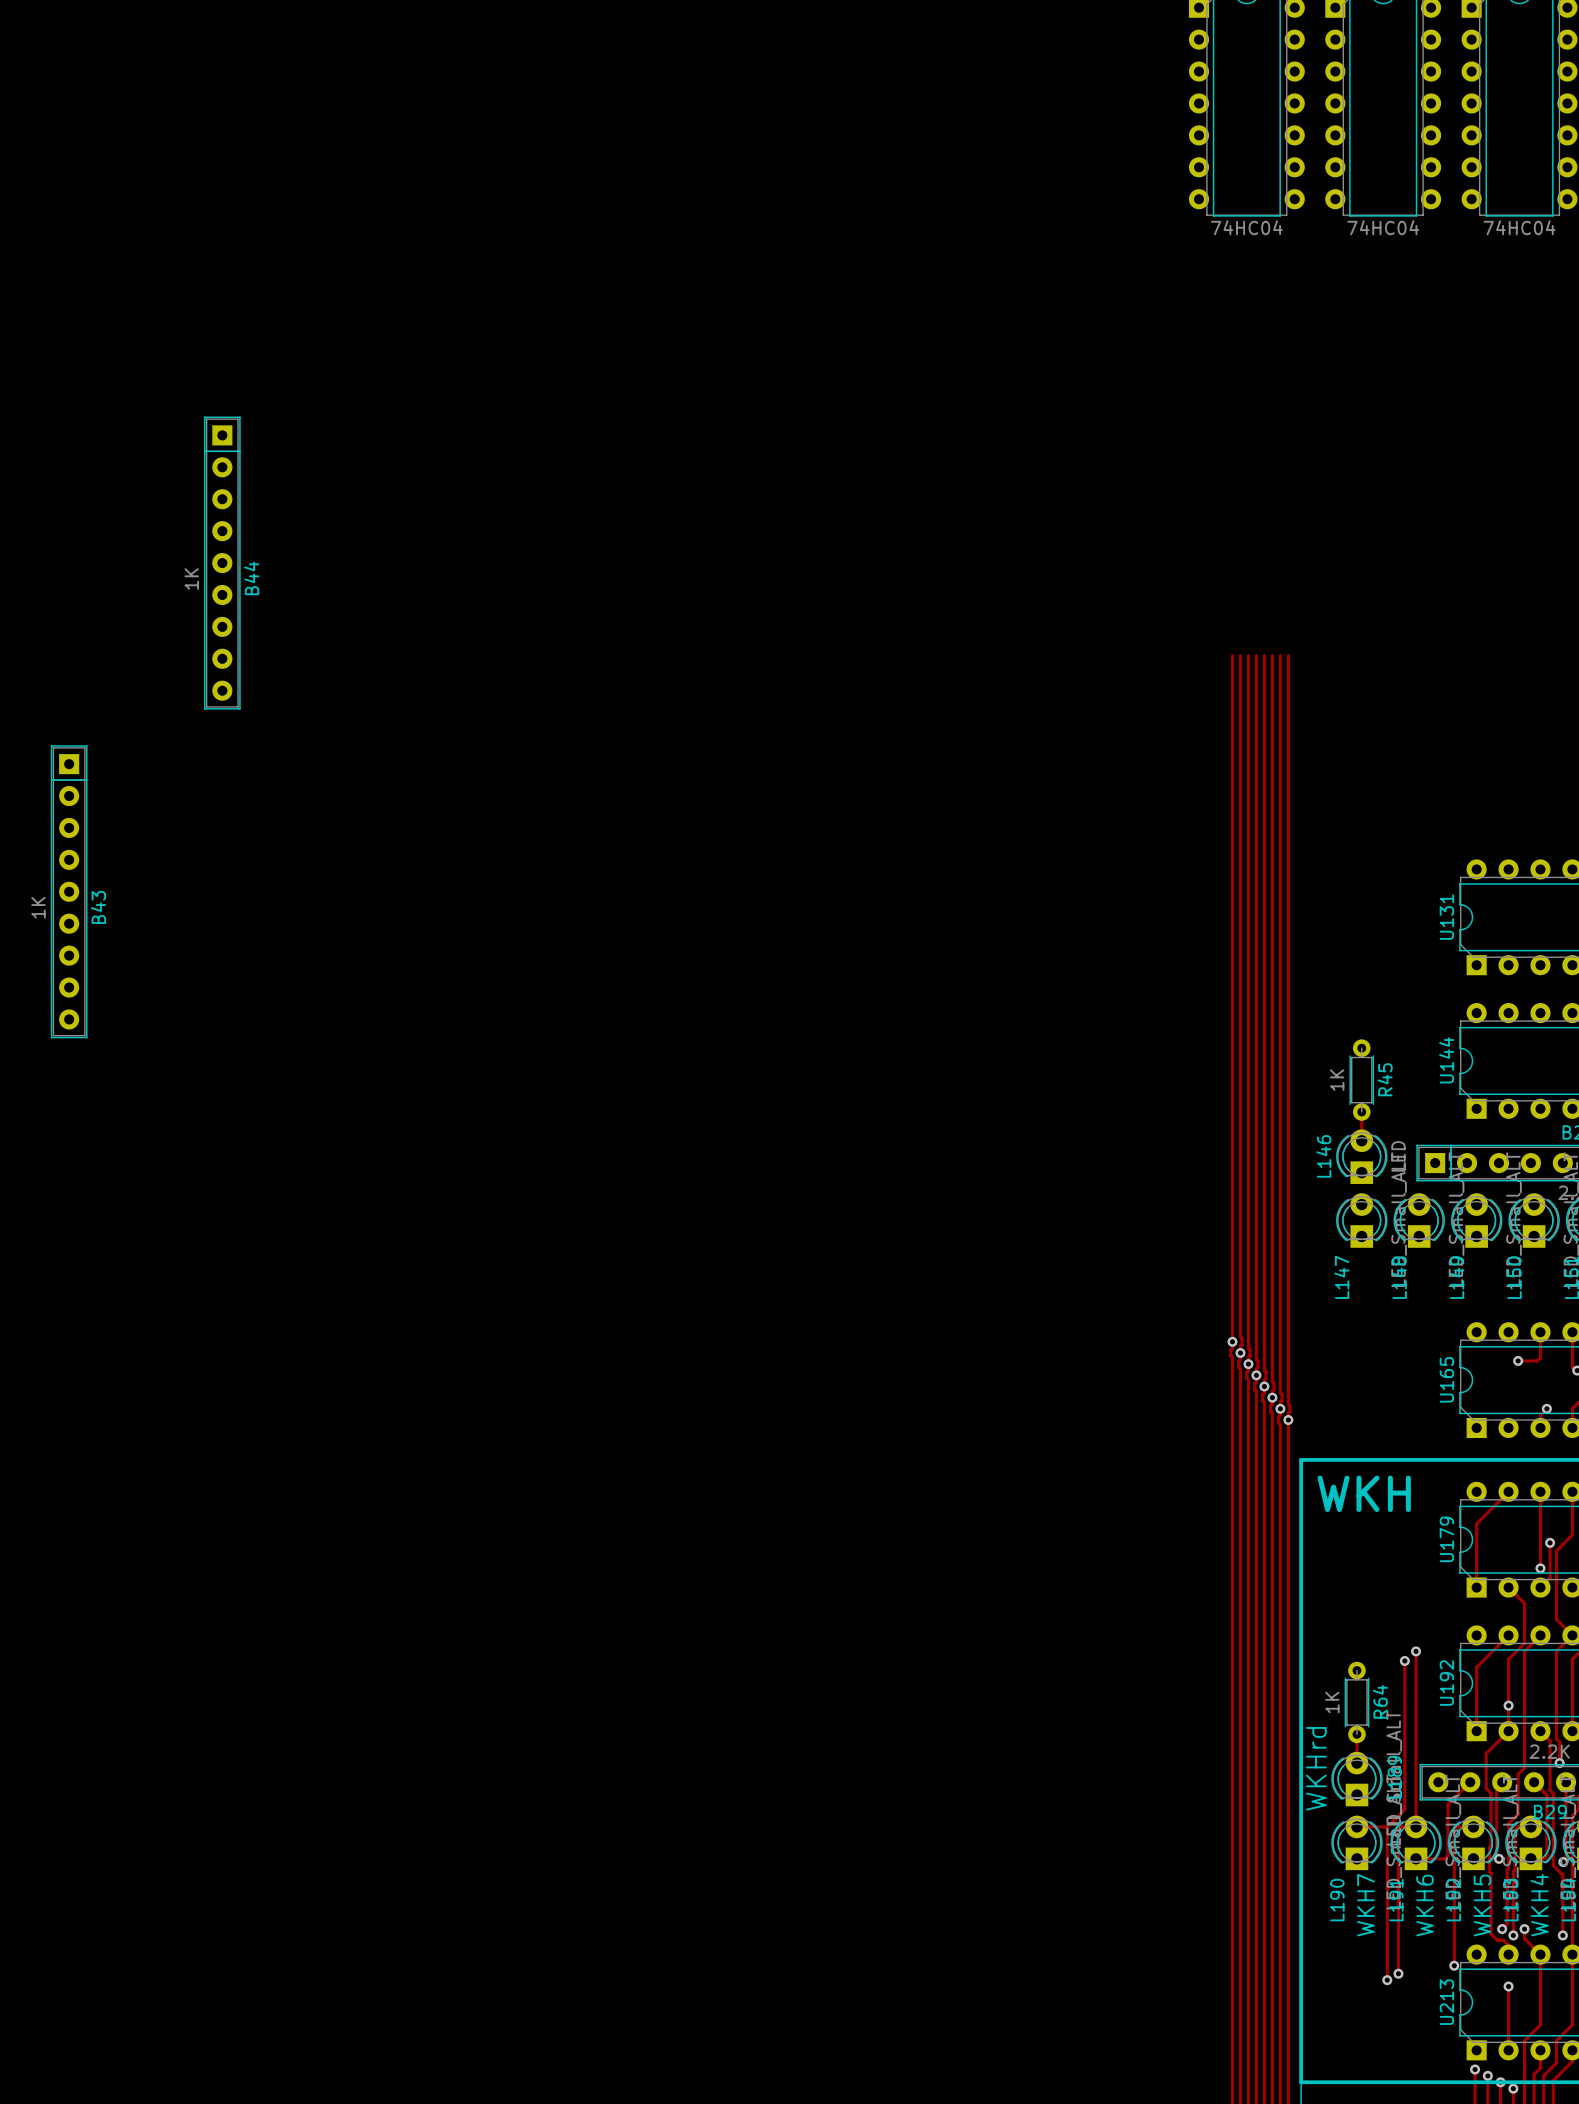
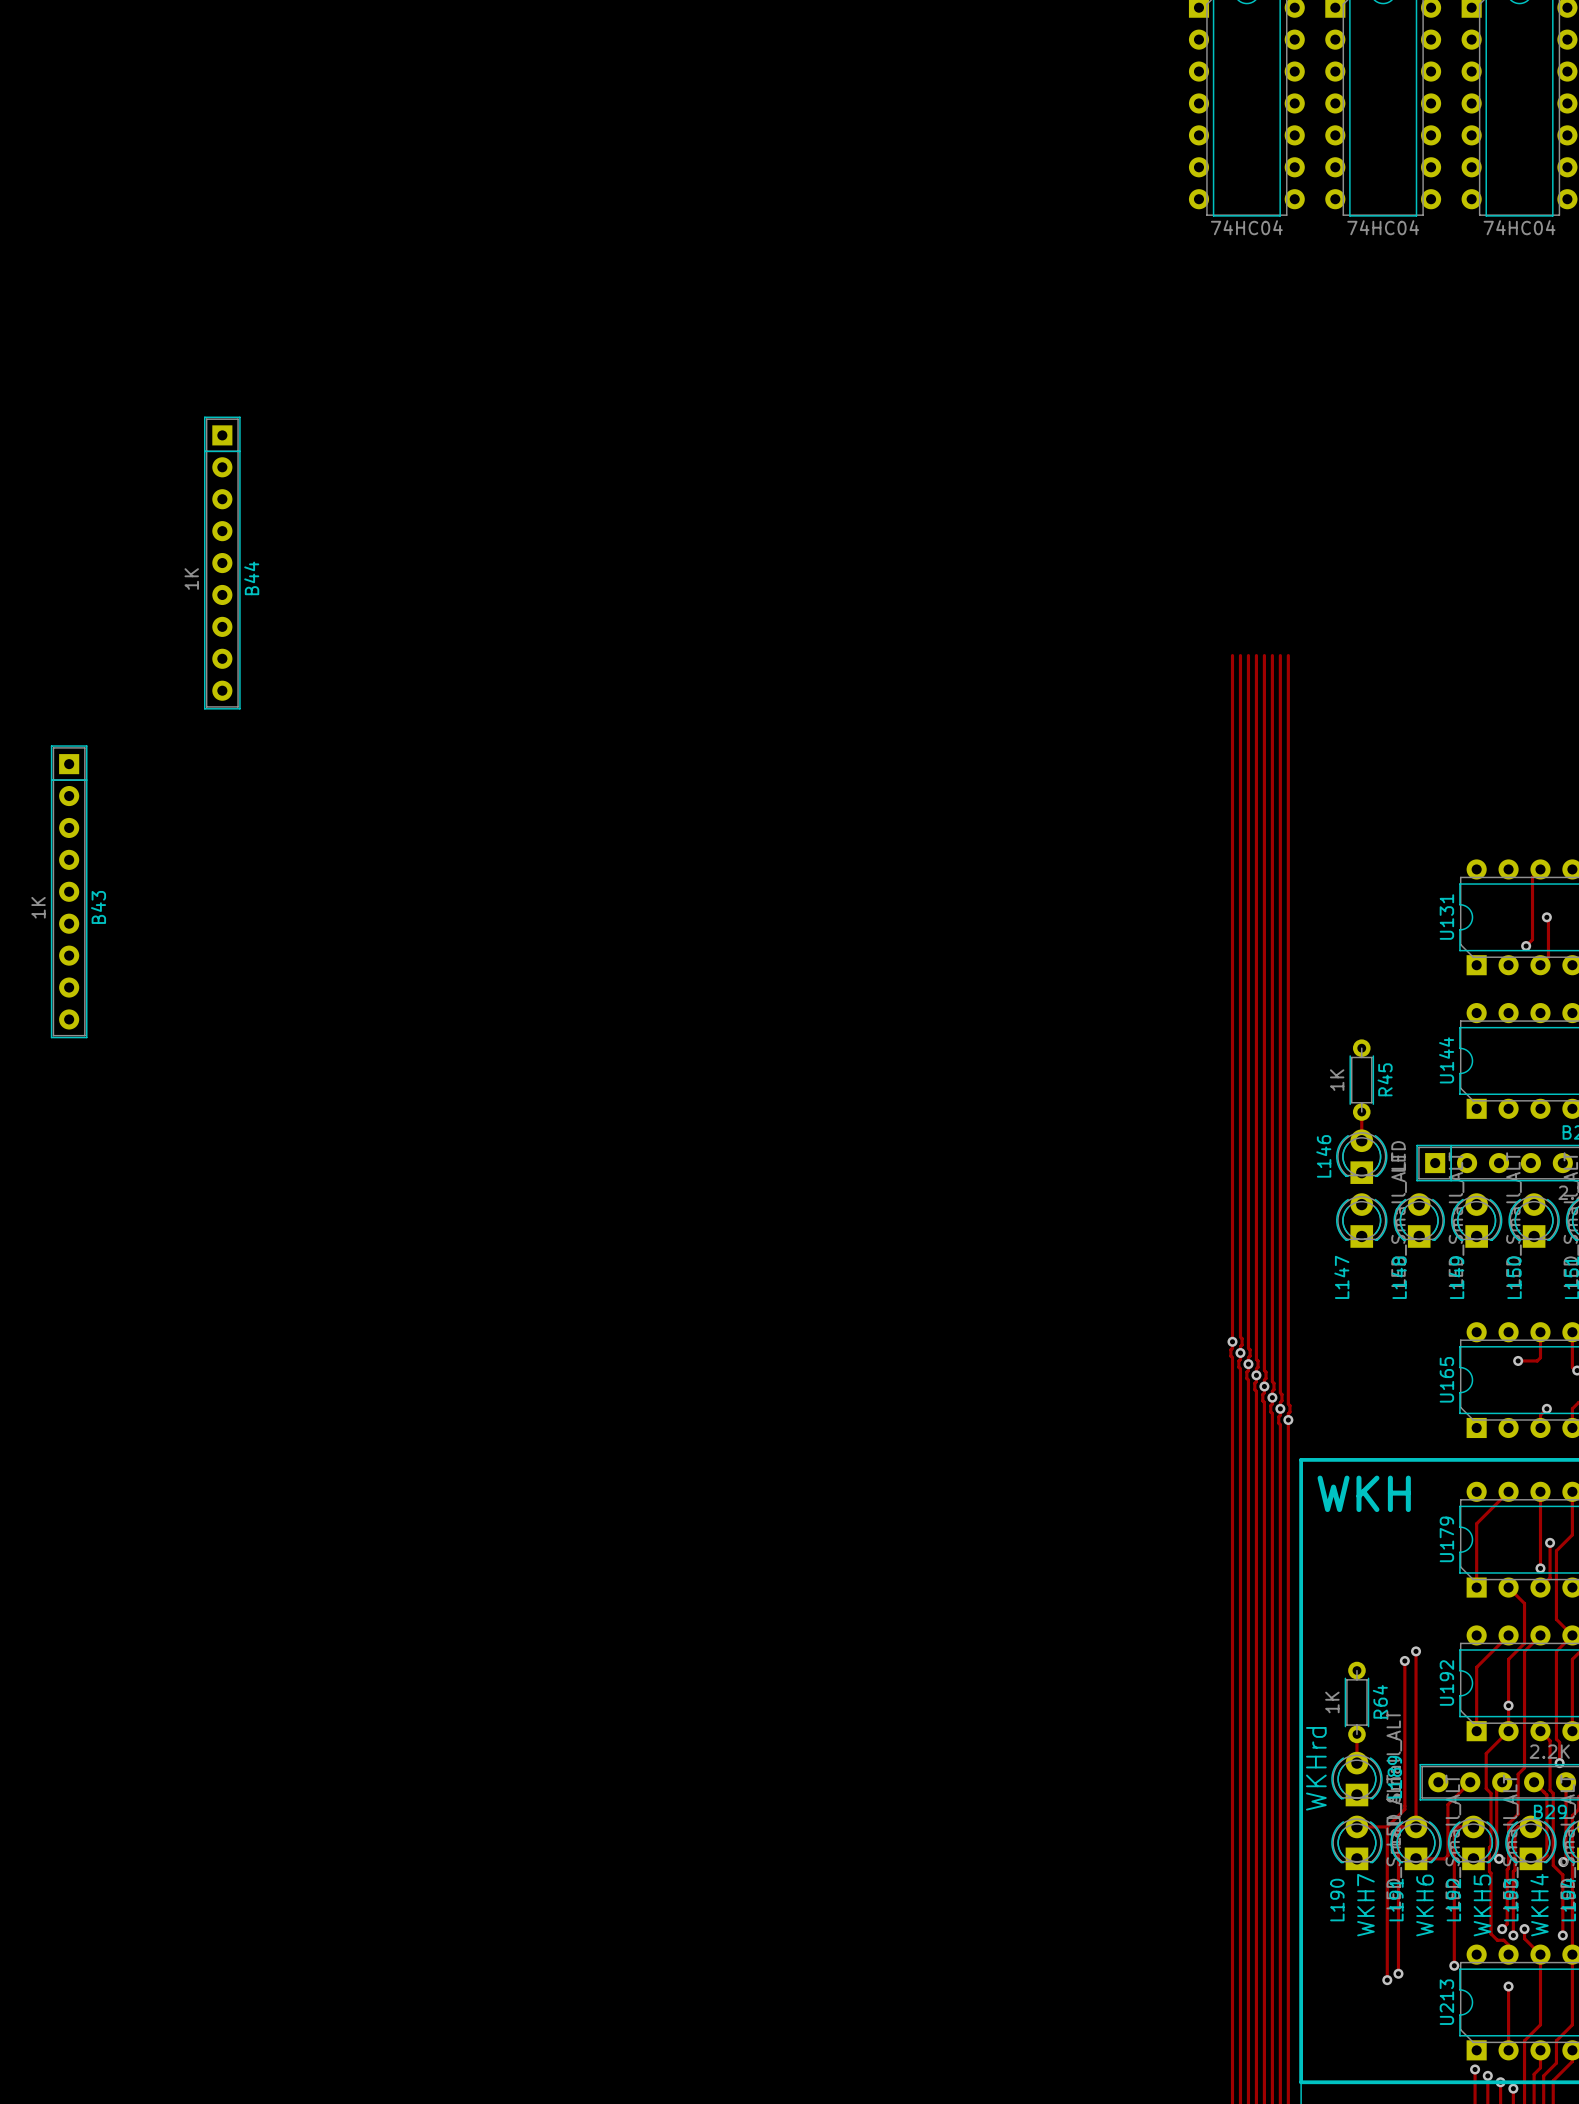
track: none -> (1540, 869) (1532, 877) (1532, 939) (1526, 946)
track: none -> (1546, 917) (1548, 918) (1548, 957) (1540, 965)
via: none -> (1546, 917)
via: none -> (1526, 946)

